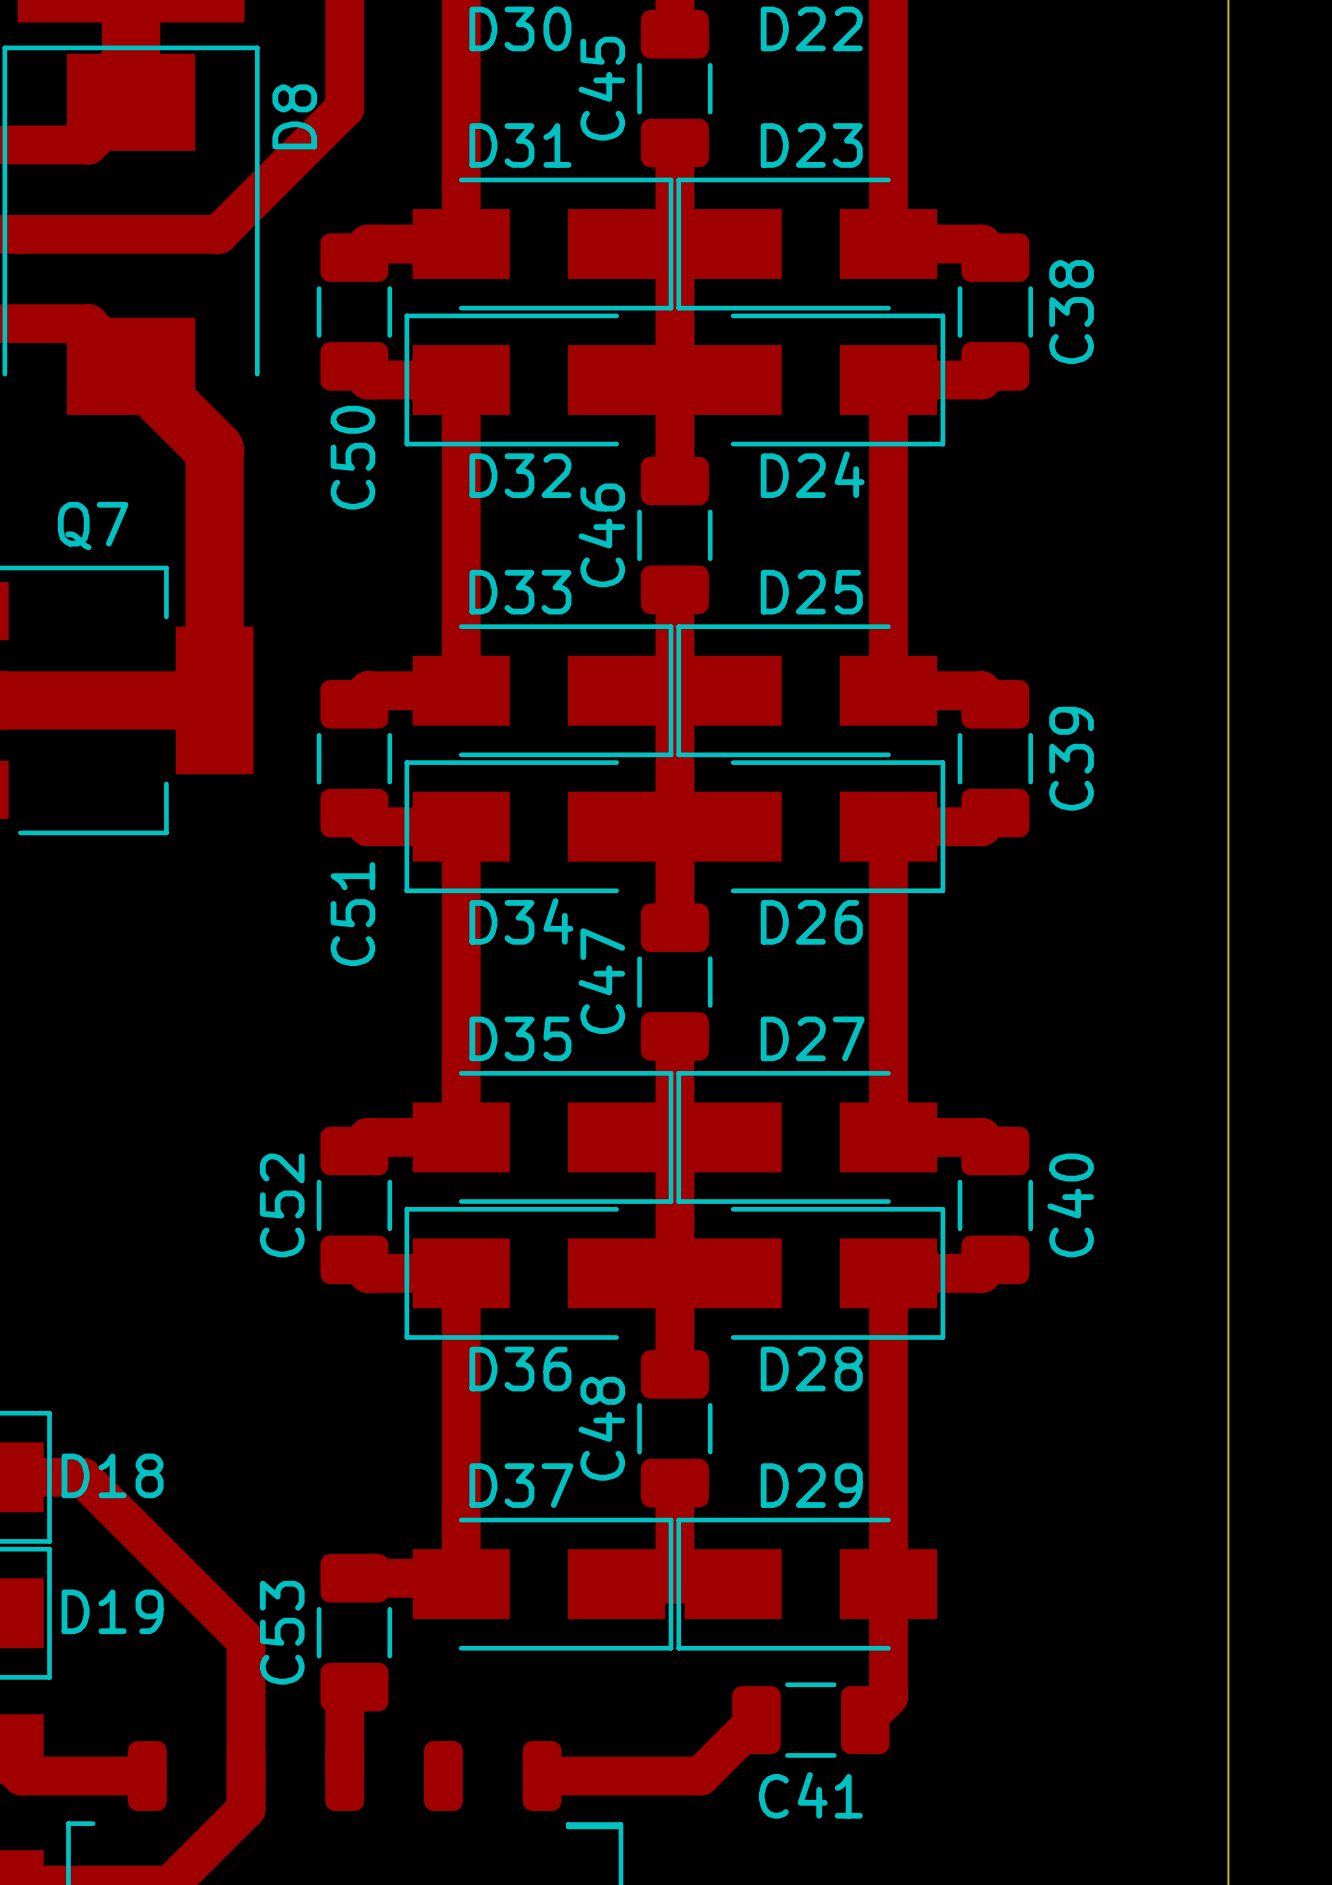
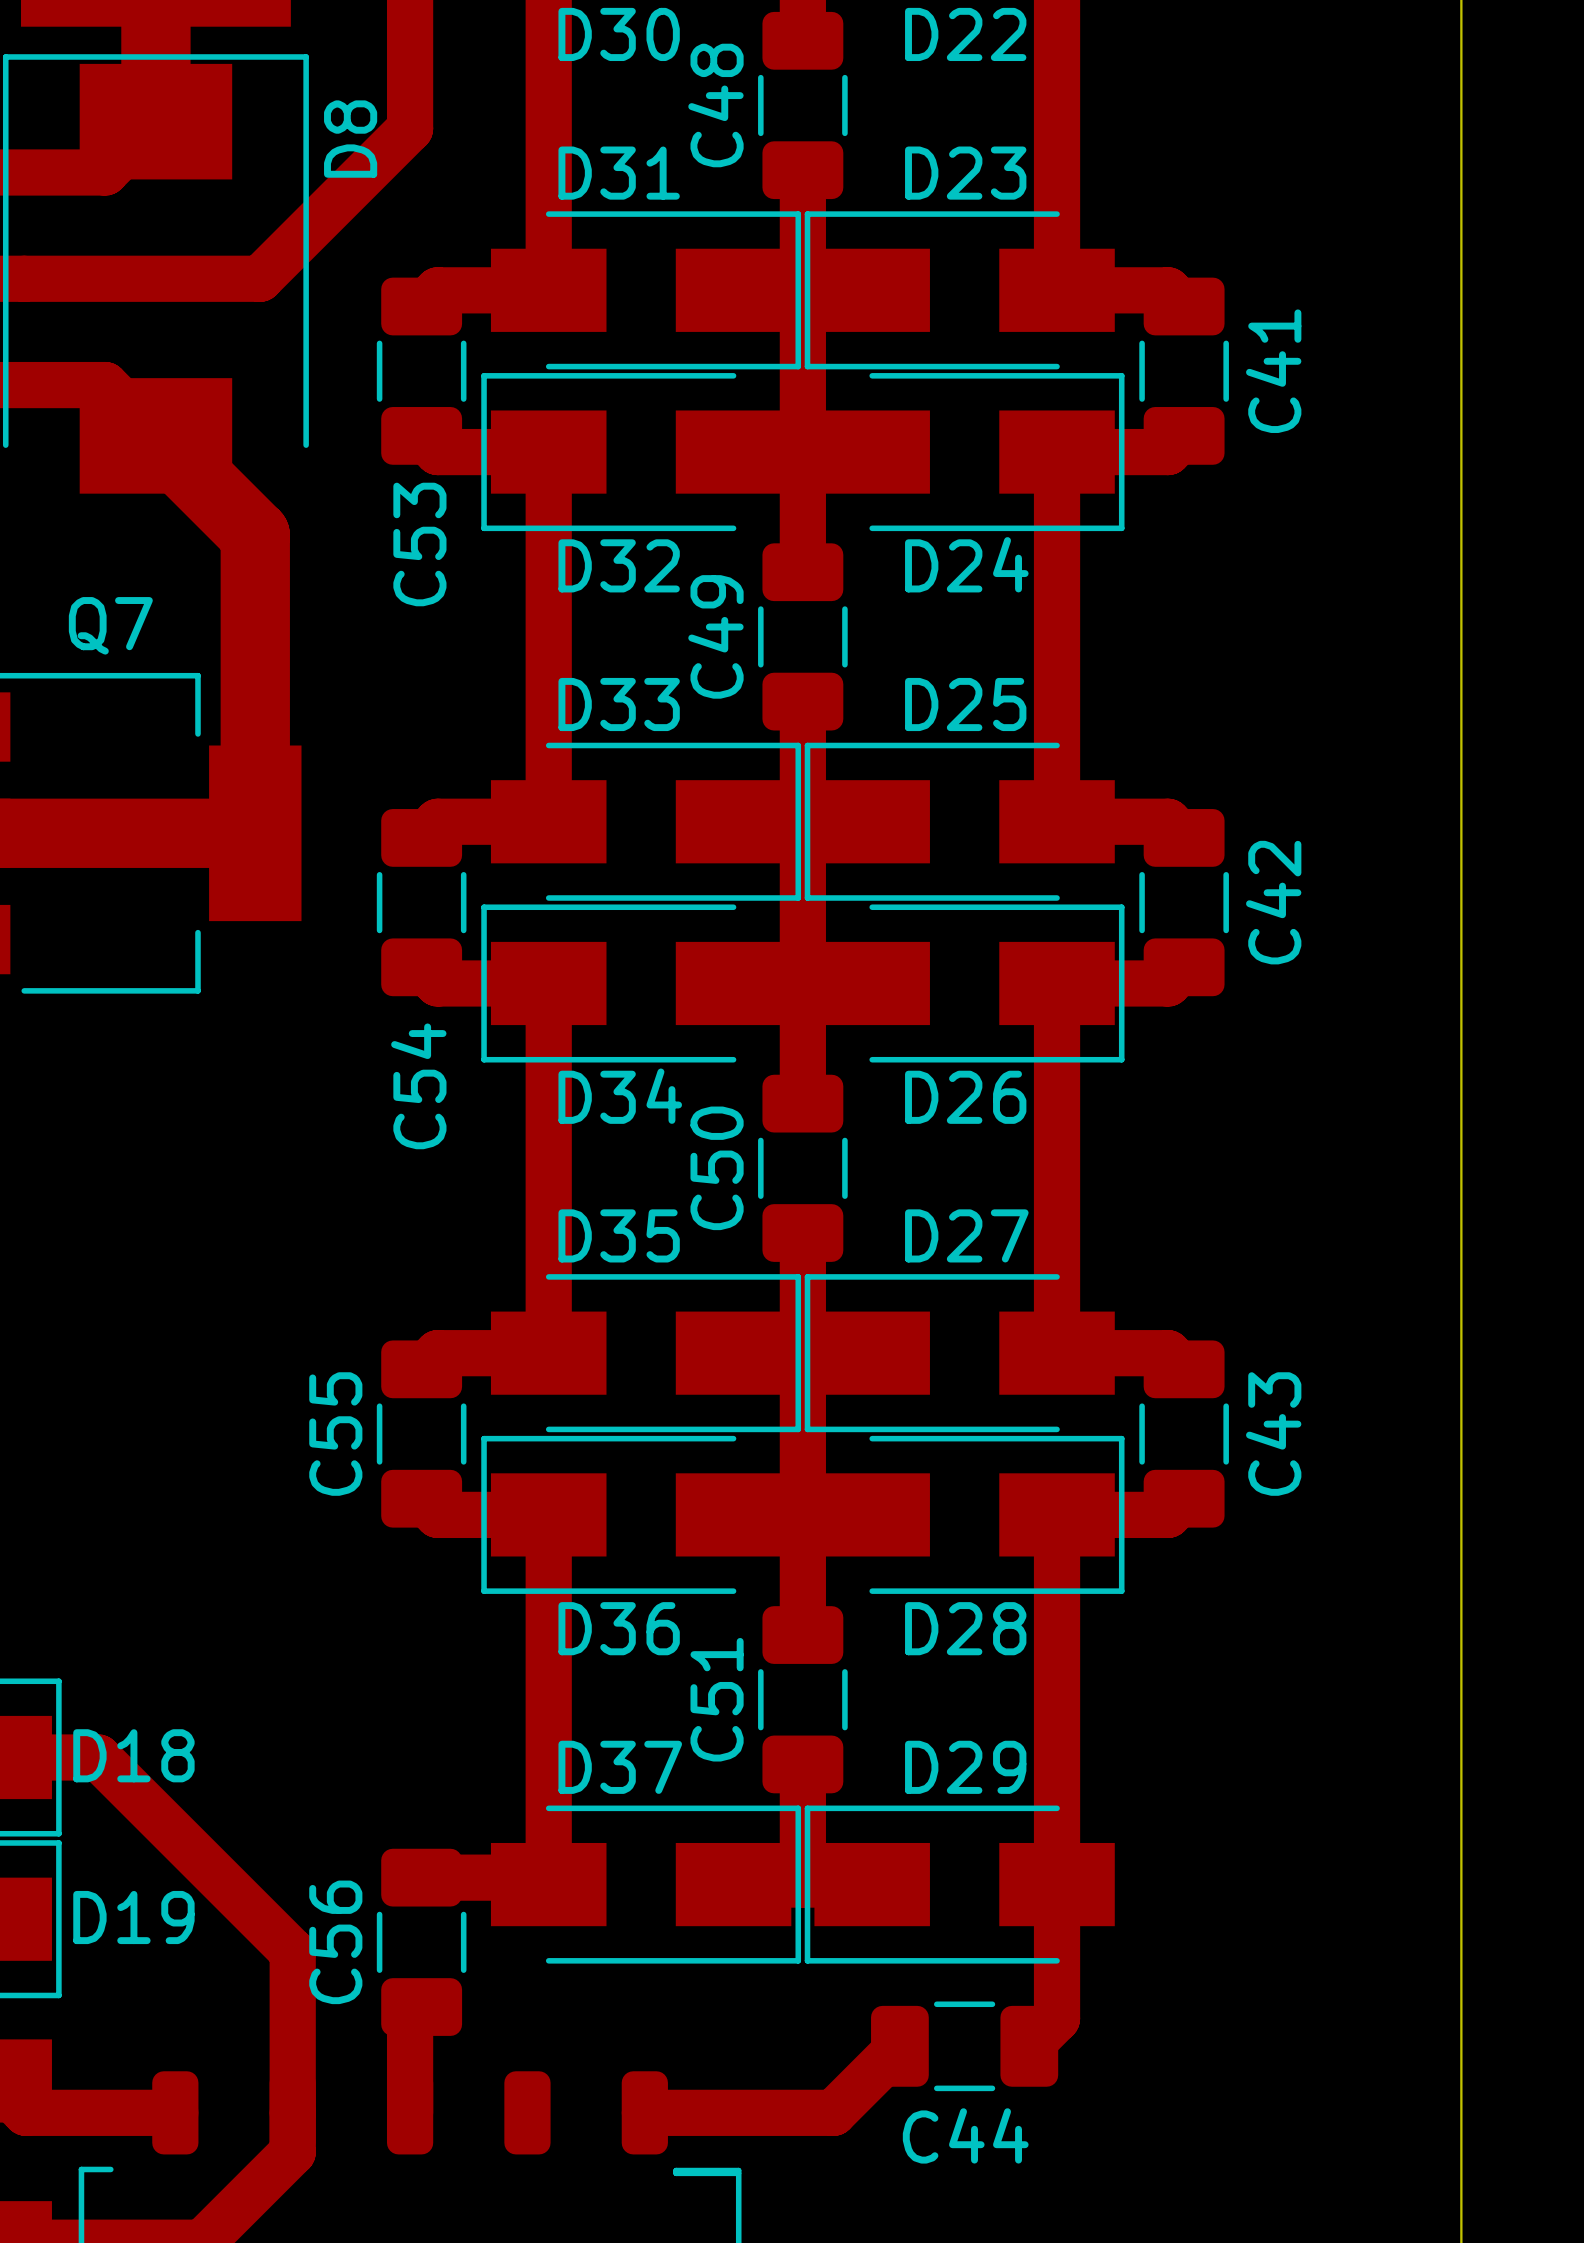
C45 name: C45 (601, 88) -> C48 (715, 105)
C38 name: C38 (1071, 312) -> C41 (1273, 371)
C50 name: C50 (352, 457) -> C53 (419, 544)
C46 name: C46 (601, 535) -> C49 (715, 636)
C39 name: C39 (1071, 758) -> C42 (1273, 902)
C51 name: C51 (352, 914) -> C54 (418, 1086)
C47 name: C47 (601, 981) -> C50 (717, 1168)
C52 name: C52 (282, 1205) -> C55 (335, 1434)
C40 name: C40 (1070, 1205) -> C43 (1273, 1434)
C48 name: C48 (601, 1428) -> C51 (717, 1699)
C53 name: C53 (282, 1632) -> C56 (335, 1942)
C41 name: C41 (810, 1795) -> C44 (965, 2135)

